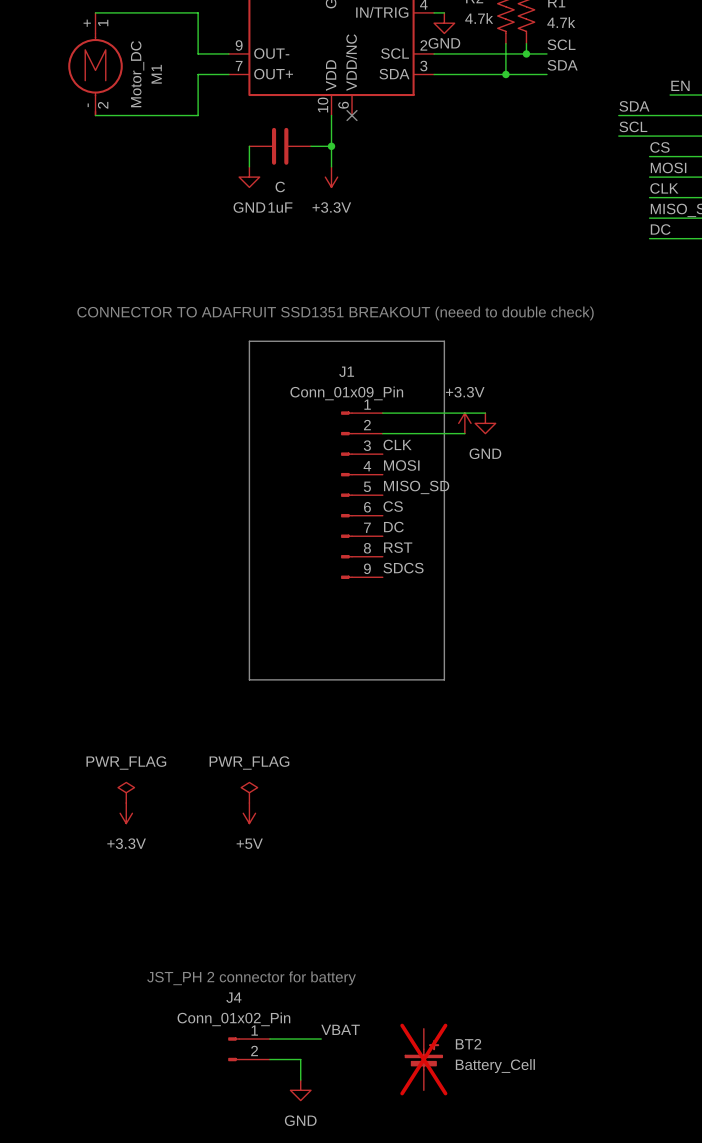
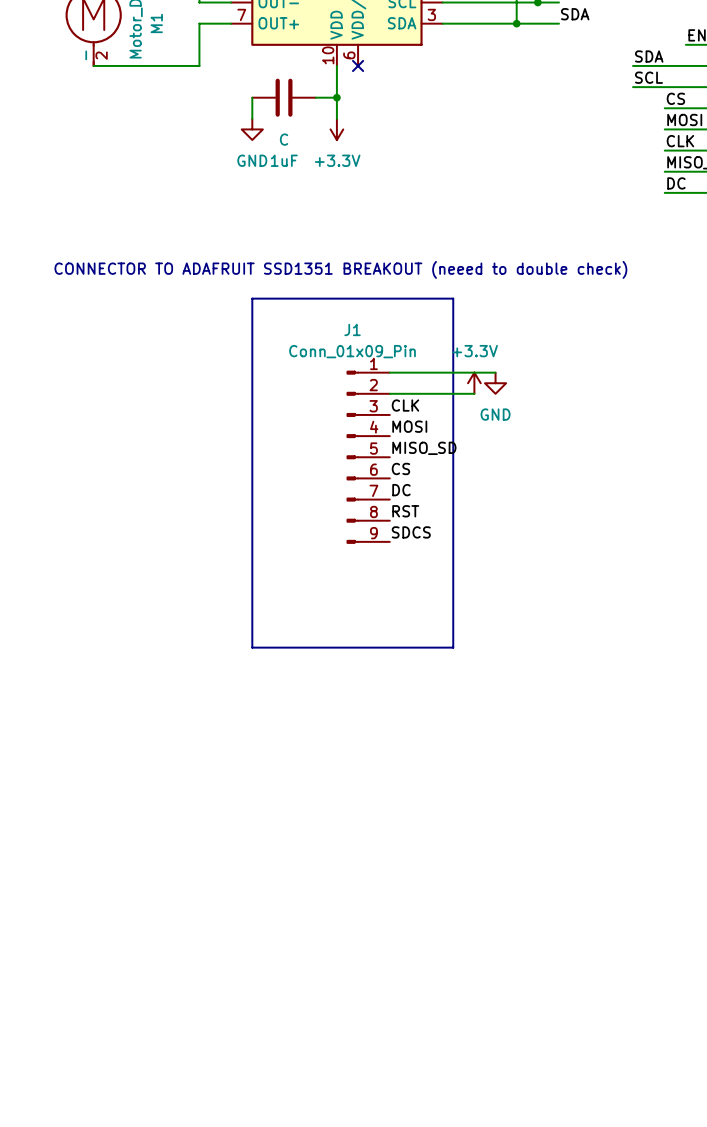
power symbol: PWR_FLAG (126, 792) -> none
power symbol: PWR_FLAG (249, 792) -> none
power symbol: +3.3V (126, 813) -> none
power symbol: +5V (249, 813) -> none
text: JST_PH 2 connector for battery (251, 978) -> none
label: VBAT (340, 1029) -> none
wire: (269, 1039) (321, 1039) -> none
J4: Conn_01x02_Pin (249, 1049) -> none
wire: (269, 1059) (300, 1059) (300, 1080) -> none
BT2: Battery_Cell (423, 1059) -> none
power symbol: GND (300, 1090) -> none

